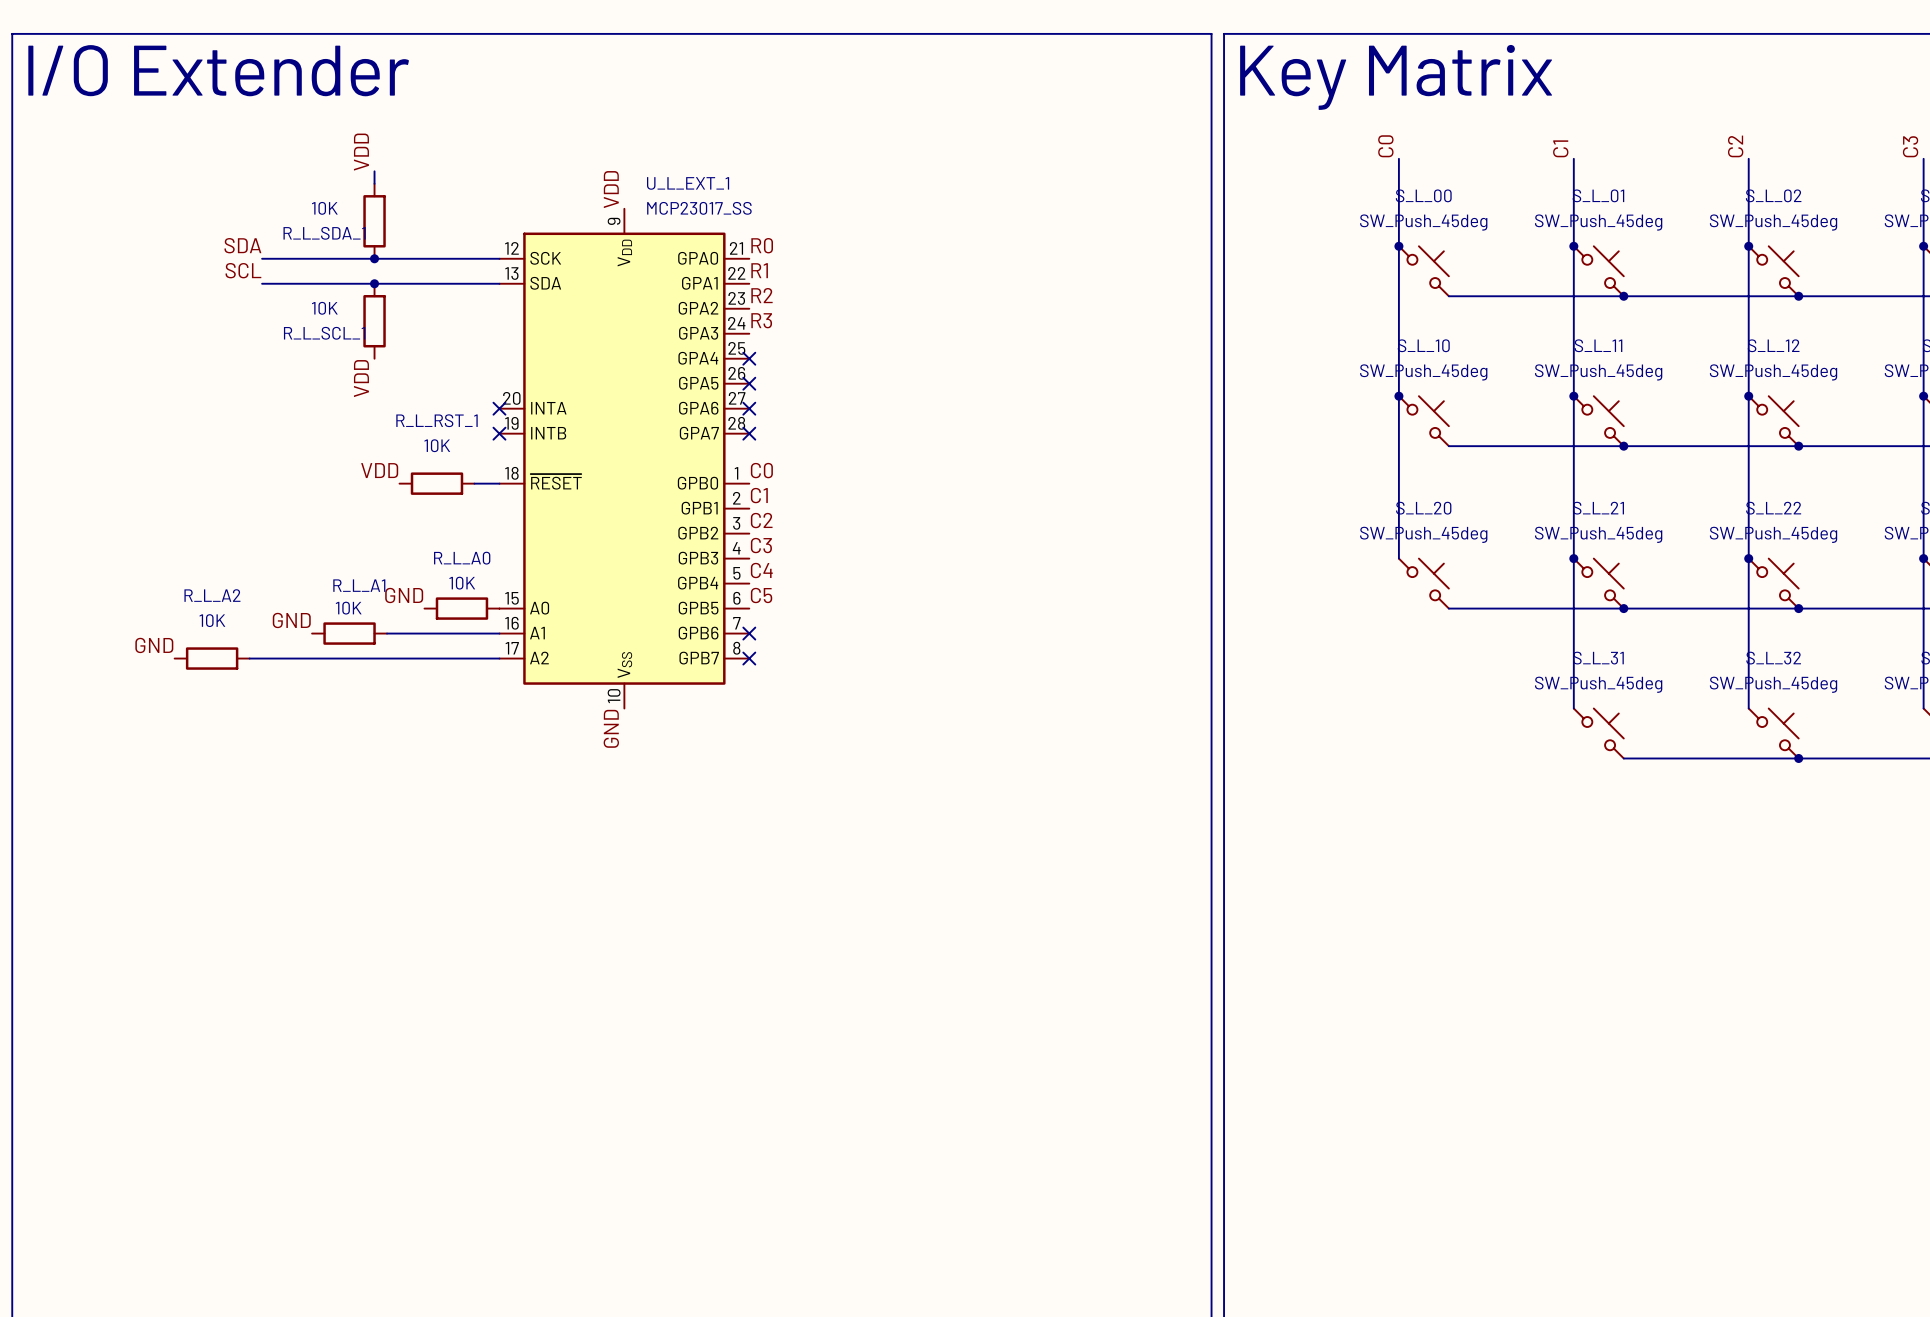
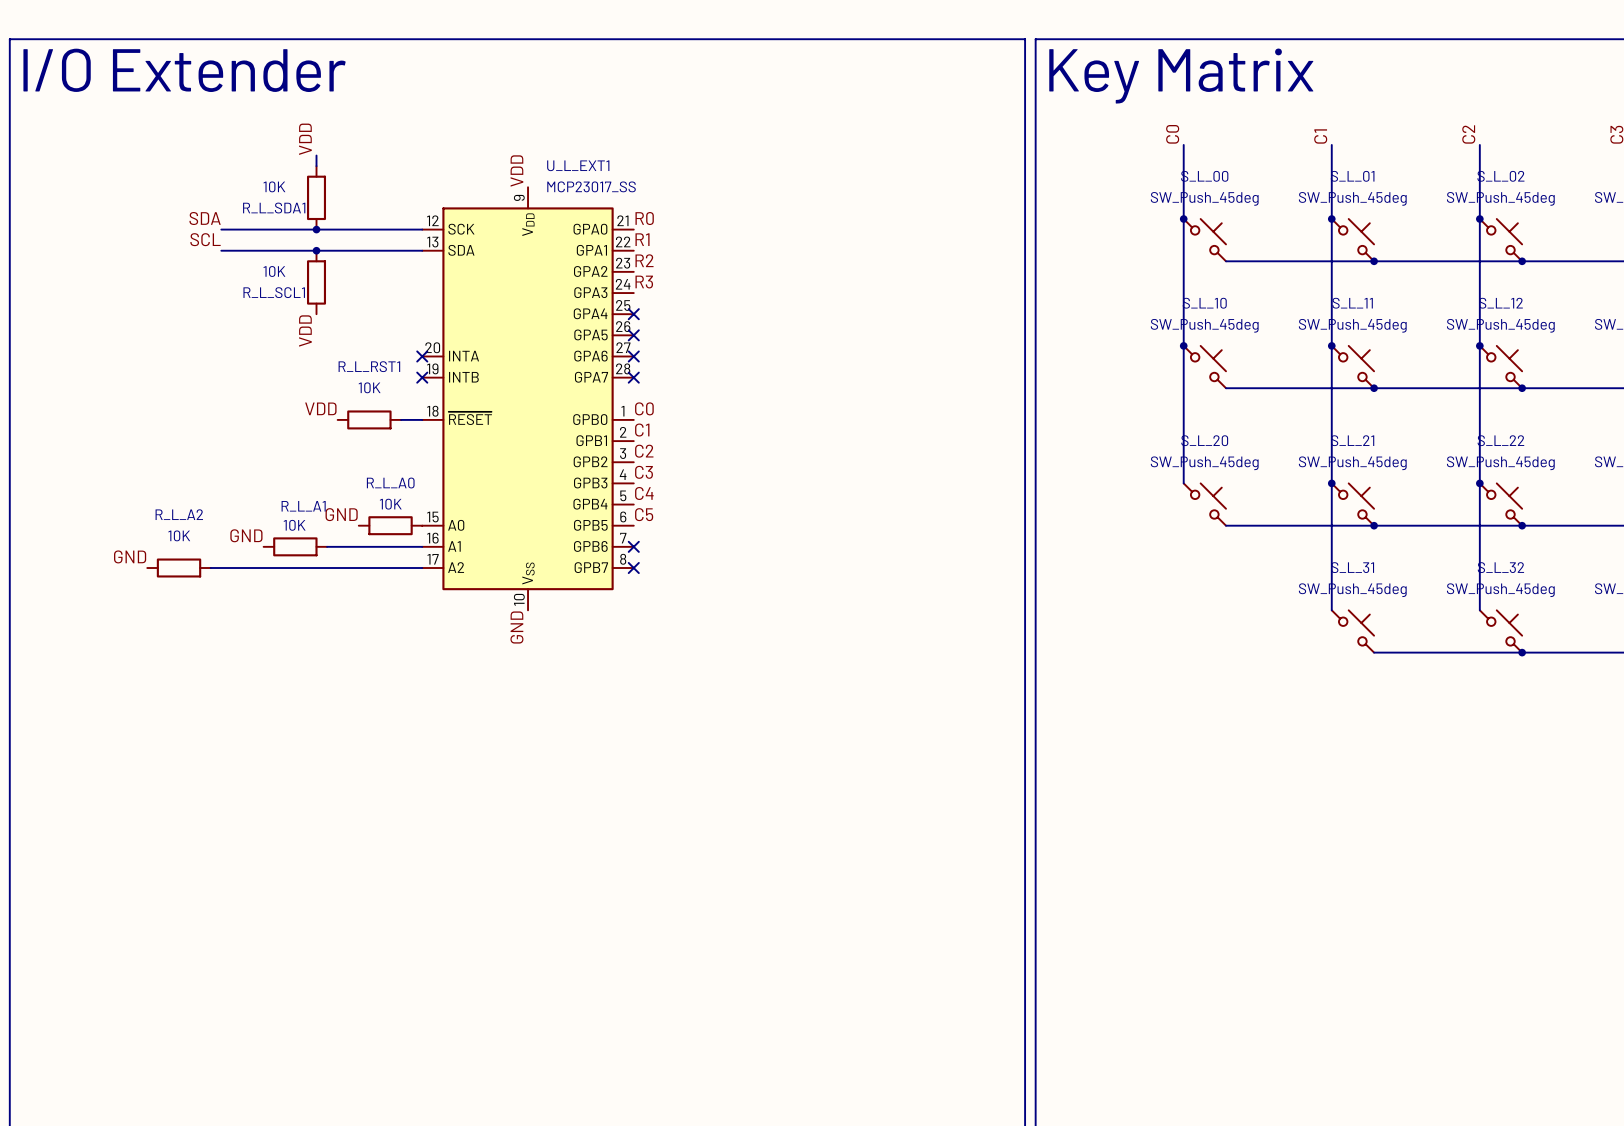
U_L_EXT_1 name: U_L_EXT_1 (688, 183) -> U_L_EXT1 (578, 165)
R_L_SDA_1 name: R_L_SDA_1 (324, 233) -> R_L_SDA1 (274, 208)
R_L_SCL_1 name: R_L_SCL_1 (324, 333) -> R_L_SCL1 (274, 292)
R_L_RST_1 name: R_L_RST_1 (437, 420) -> R_L_RST1 (369, 366)

